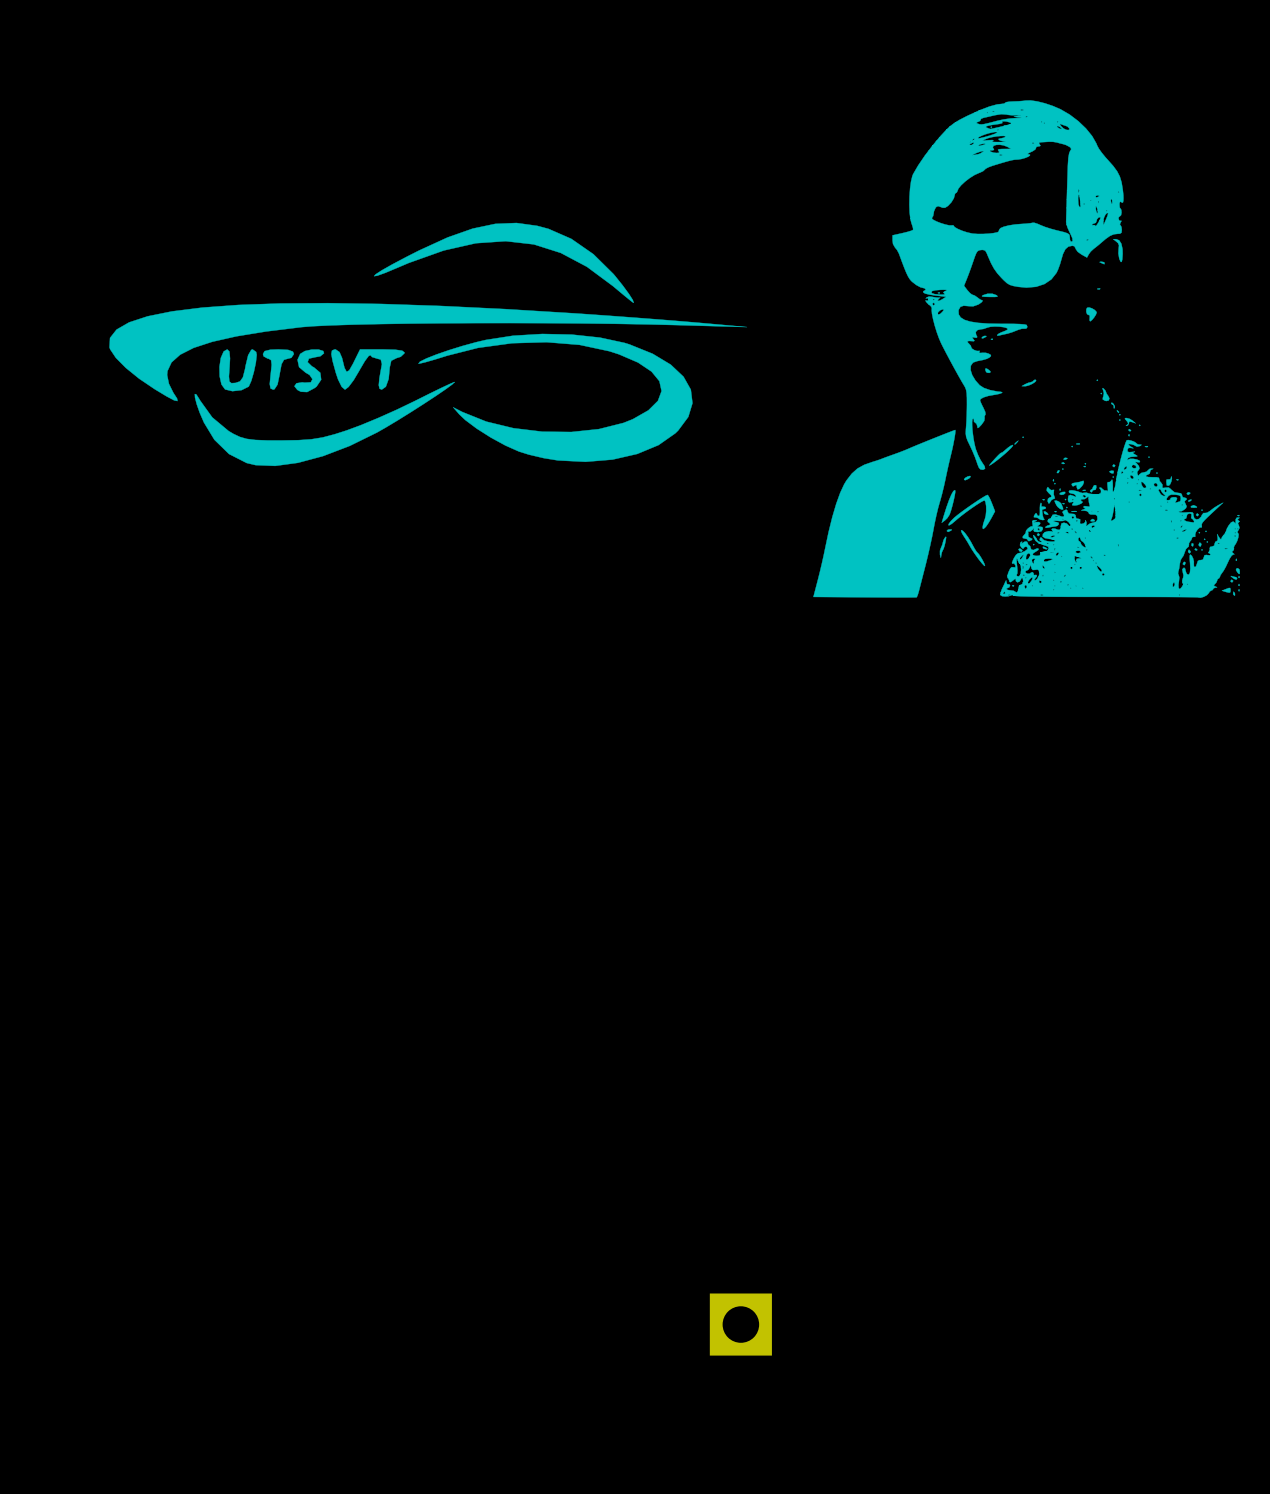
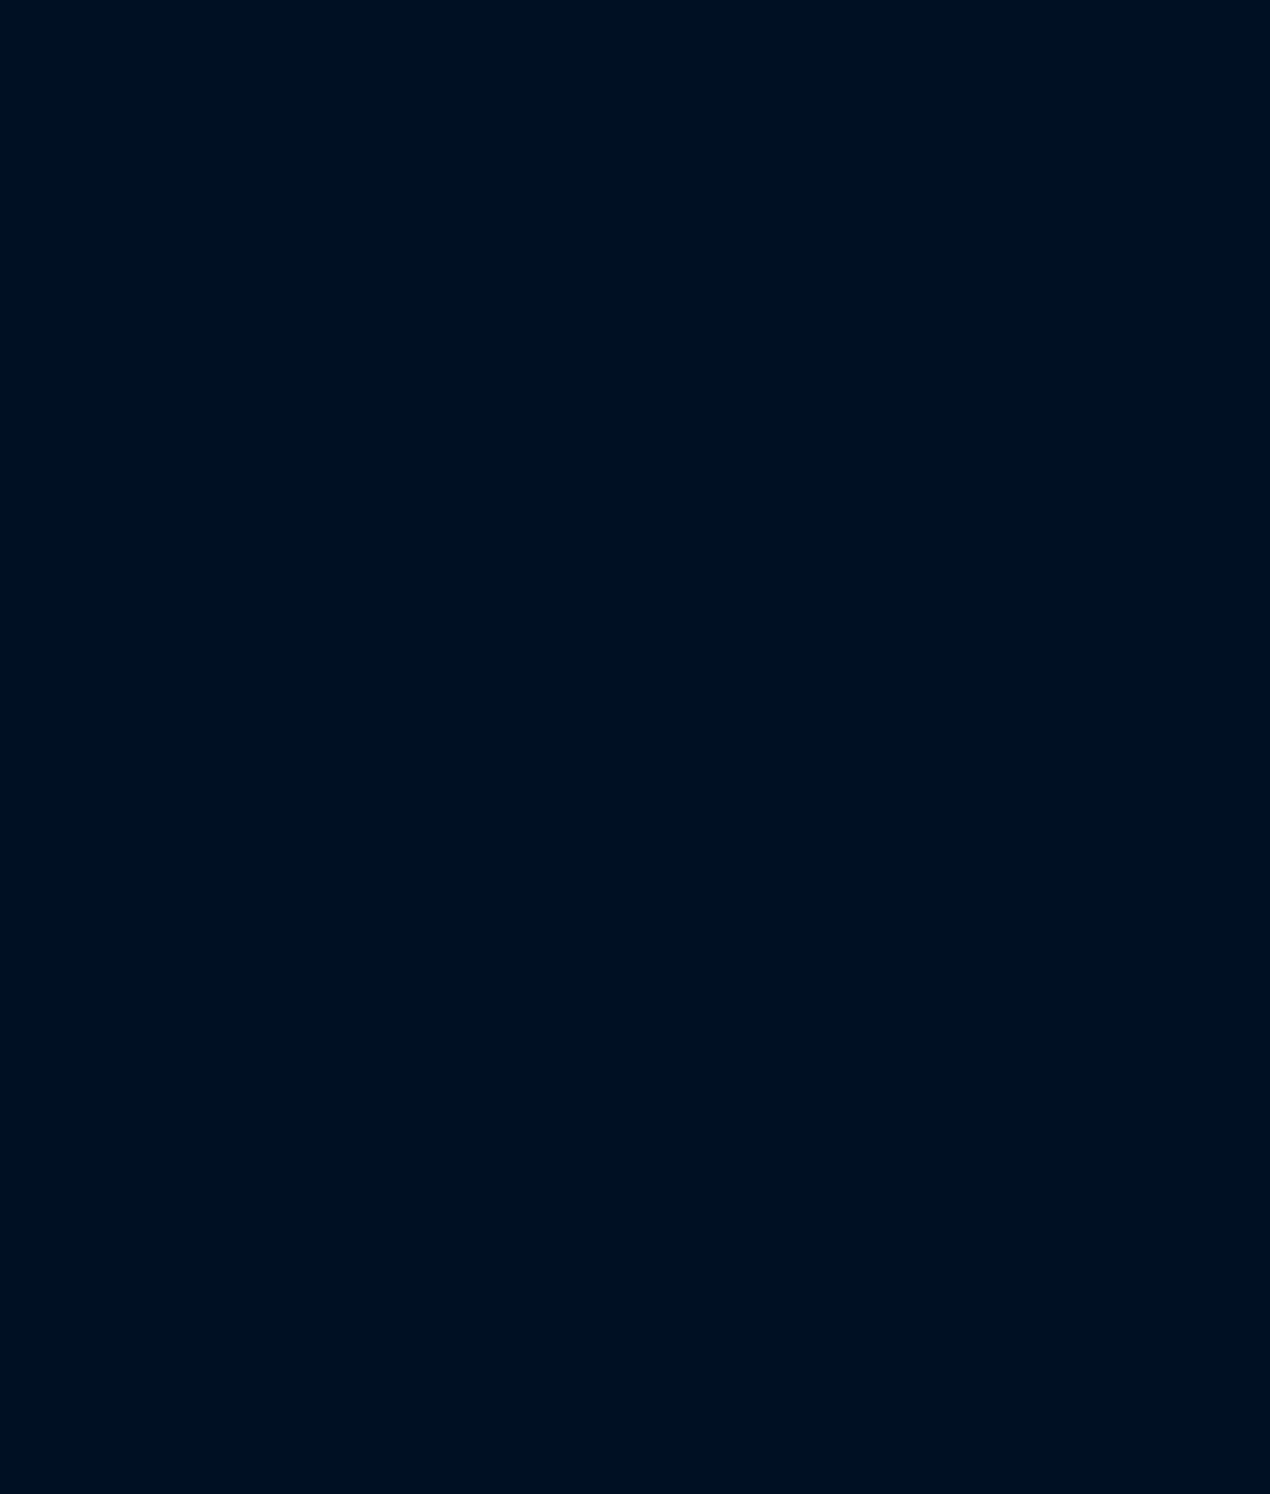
drawing: [813, 100, 1240, 598] -> none
drawing: [109, 222, 748, 467] -> none
part: (740, 1324) -> none

